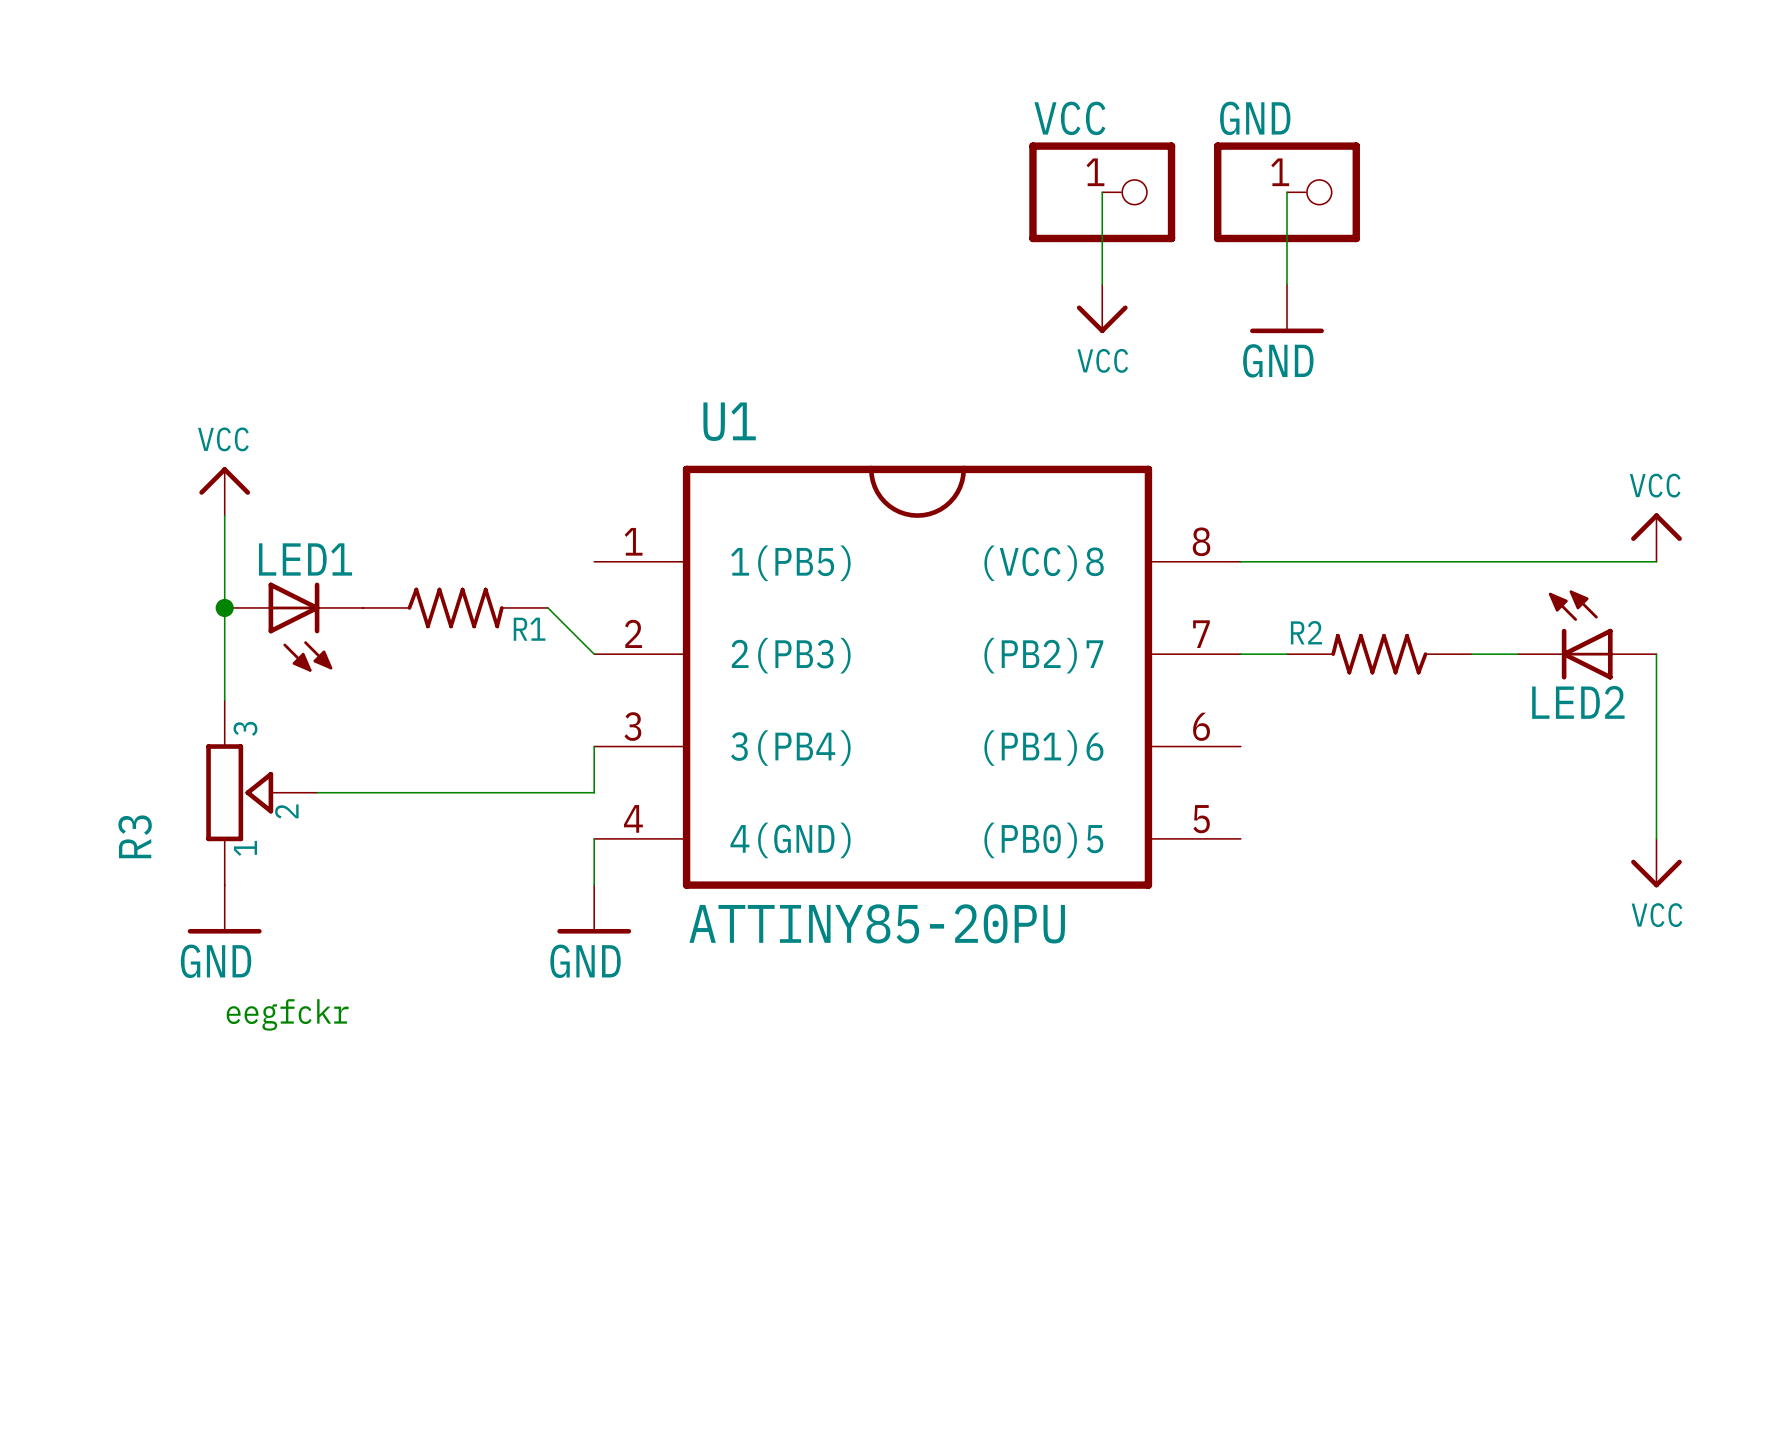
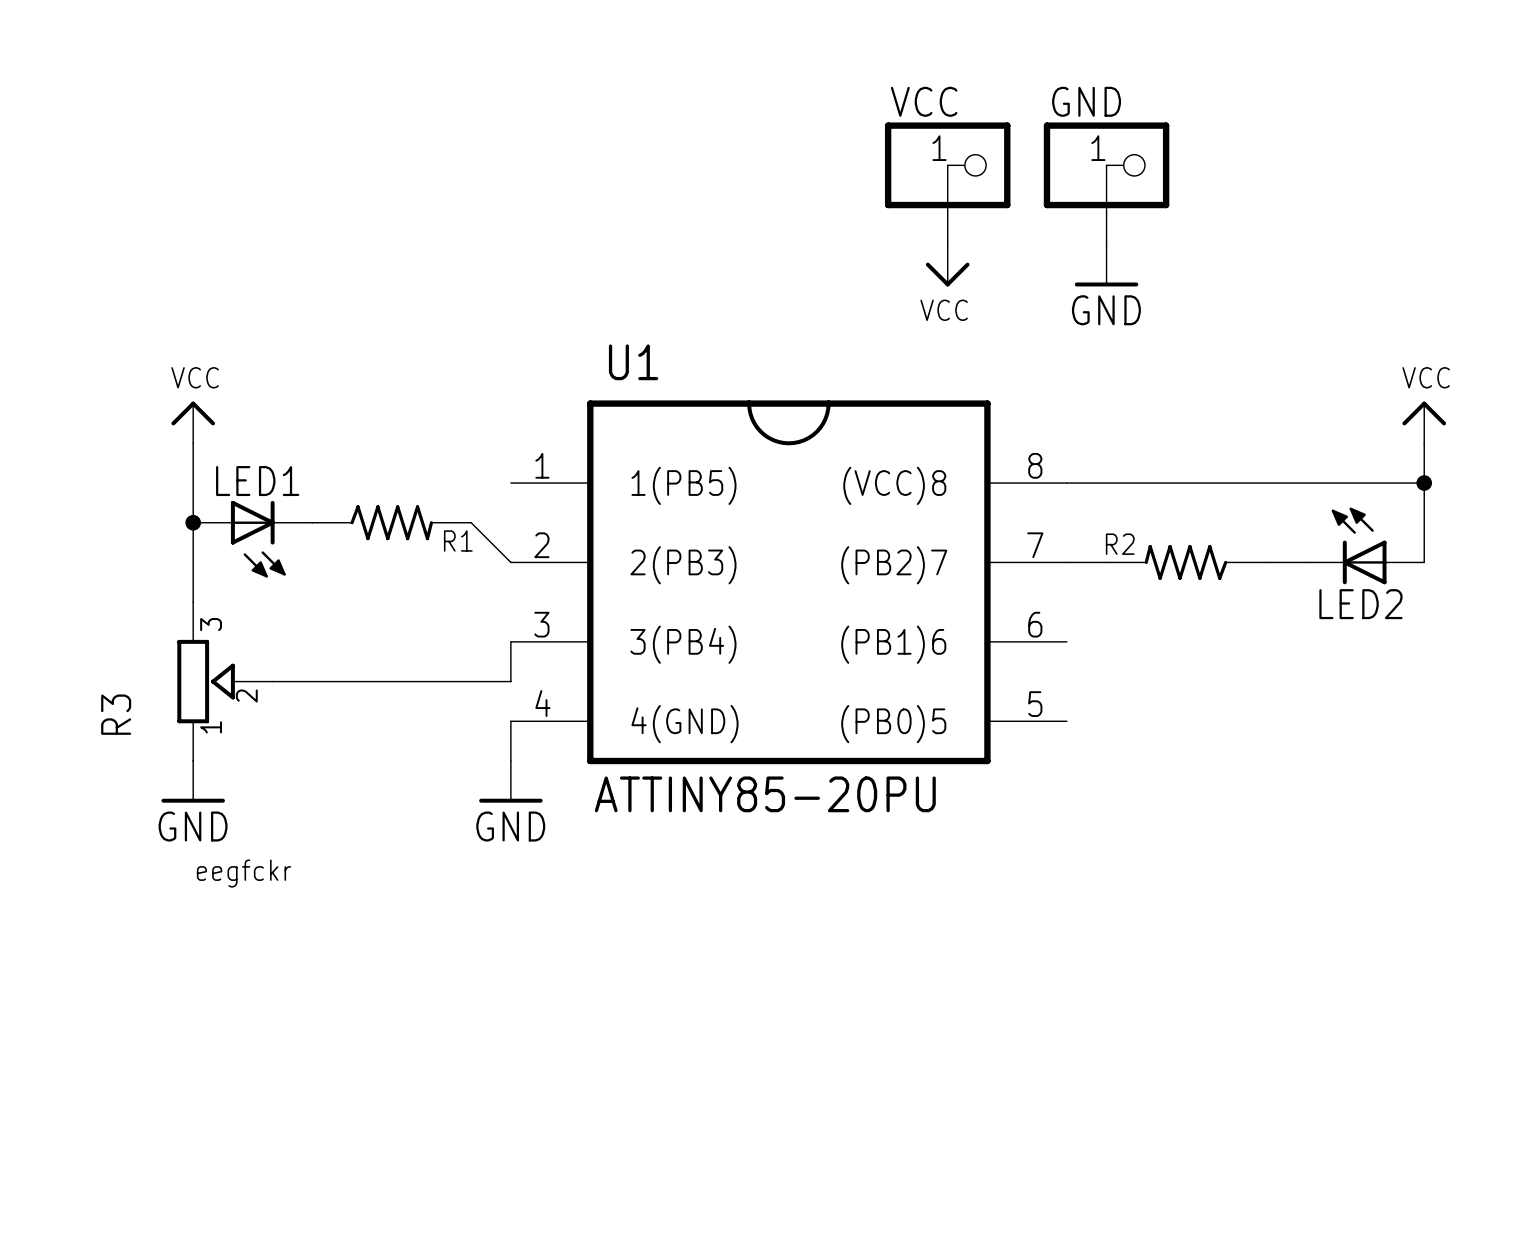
power symbol position: VCC (1656, 537) -> VCC (1424, 422)
junction: none -> (1424, 483)
wire: (1656, 654) (1656, 838) -> (1424, 562) (1424, 443)
power symbol: VCC (1656, 863) -> none

